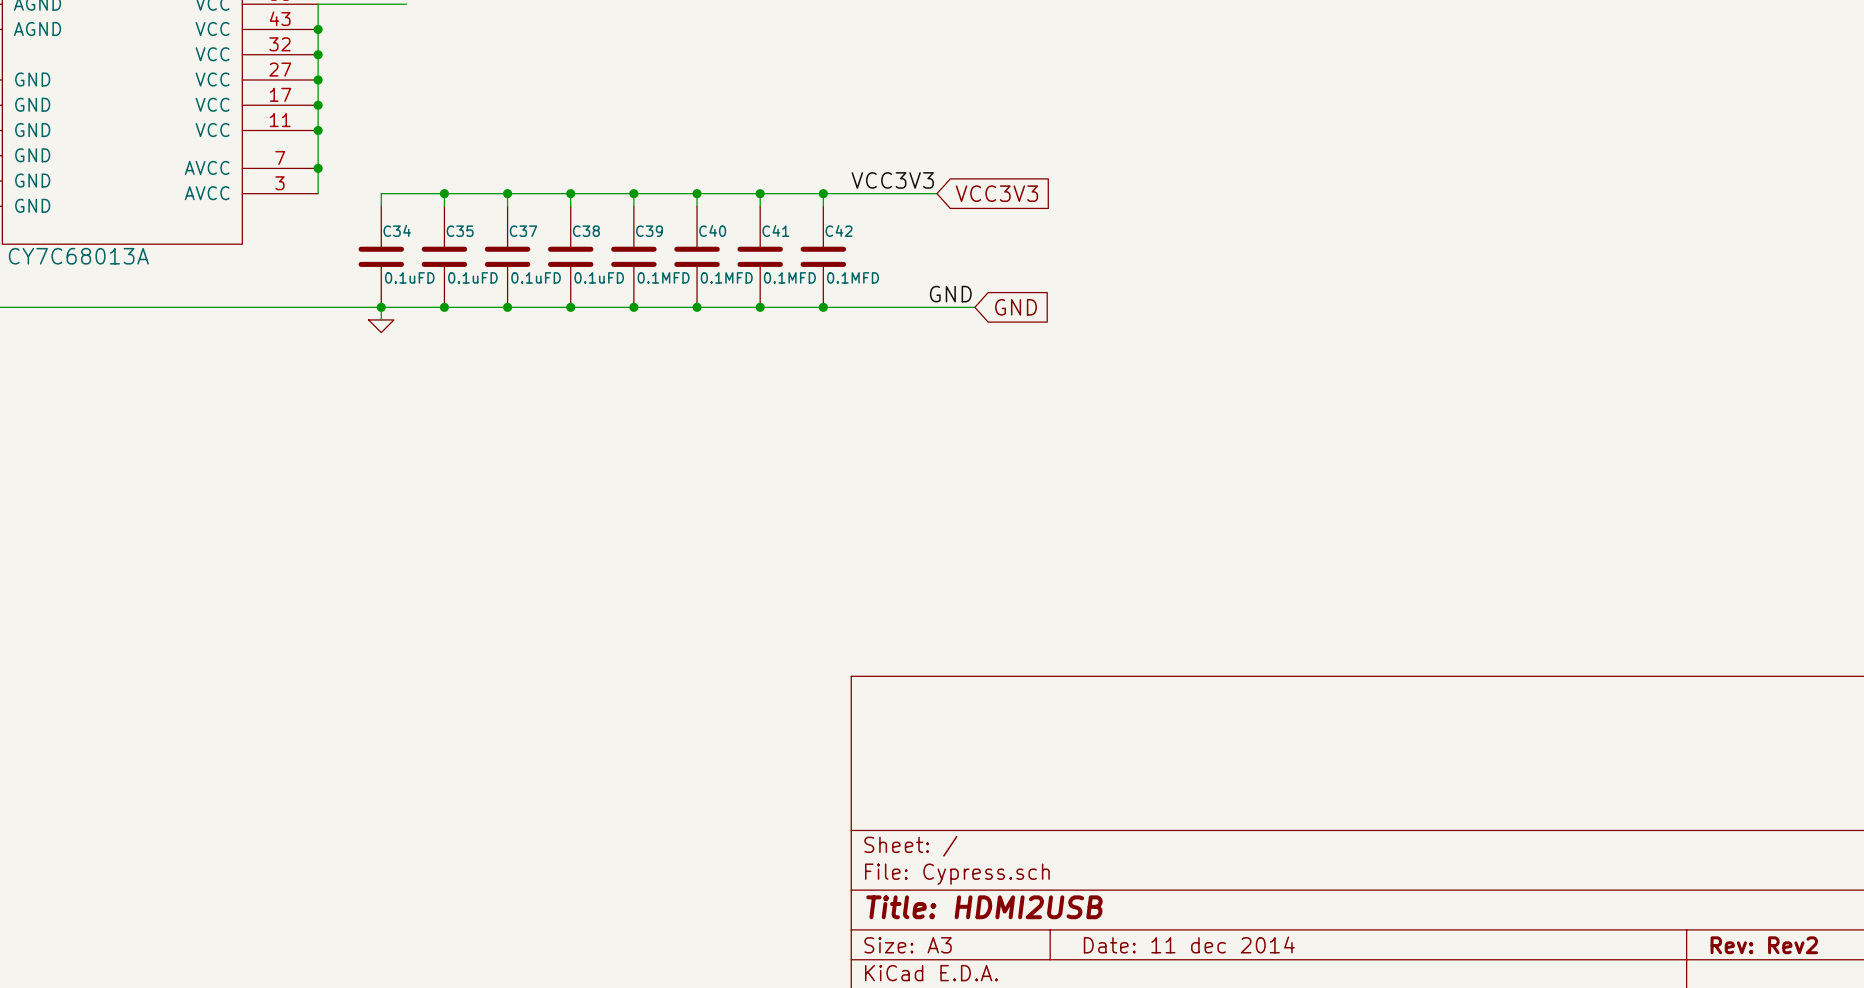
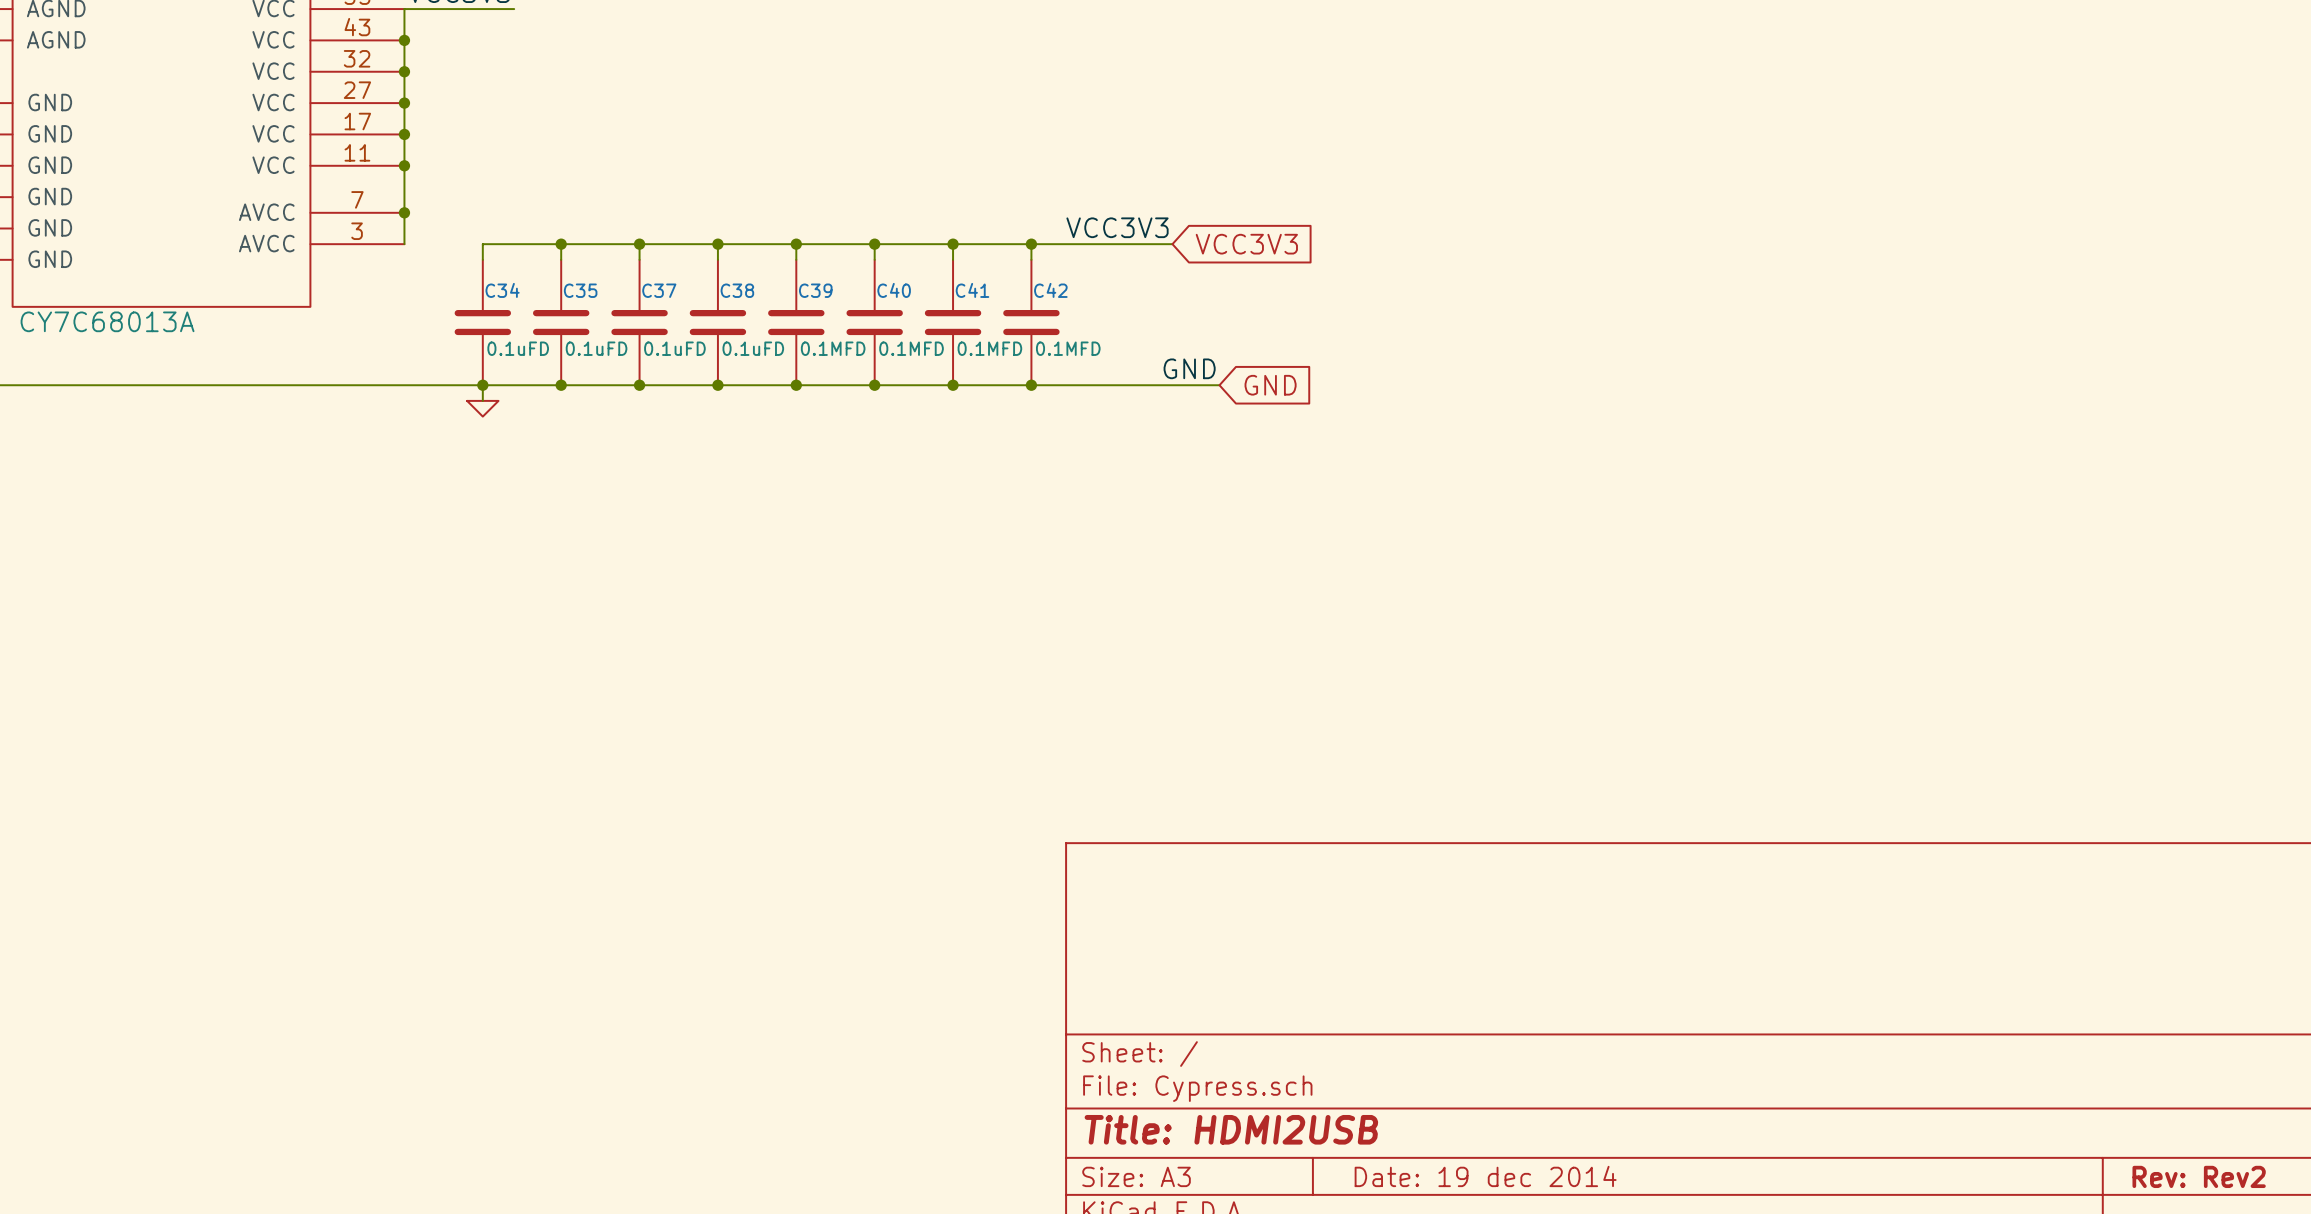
title block: Date: 11 dec 2014 (1189, 944) -> Date: 19 dec 2014 (1485, 1176)

